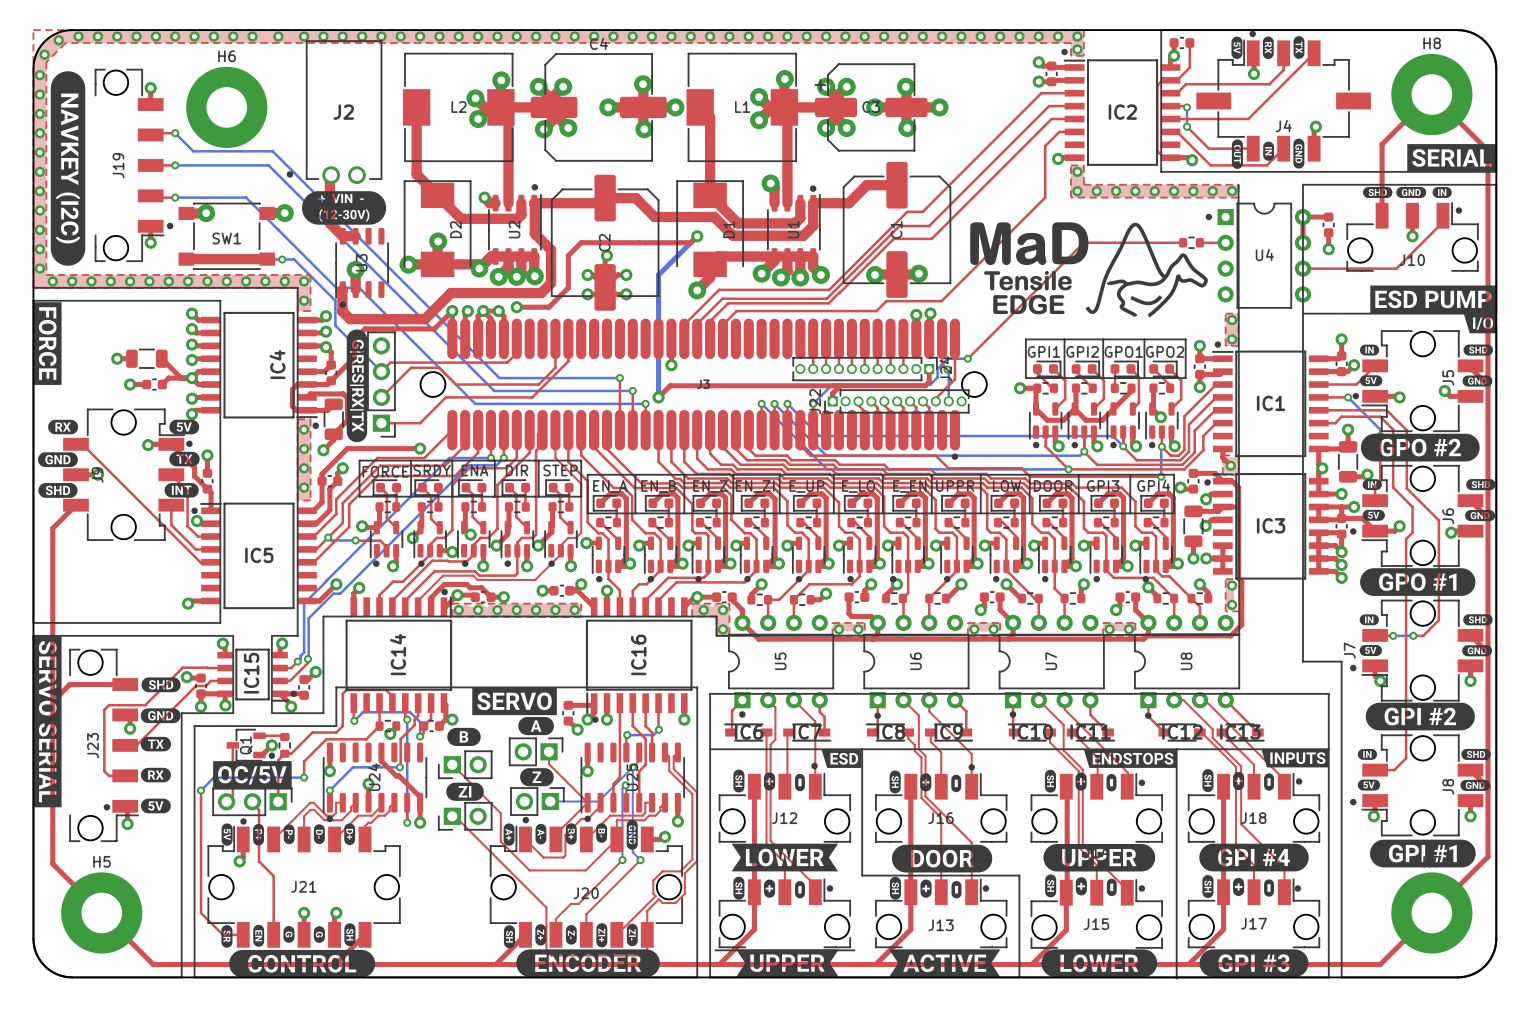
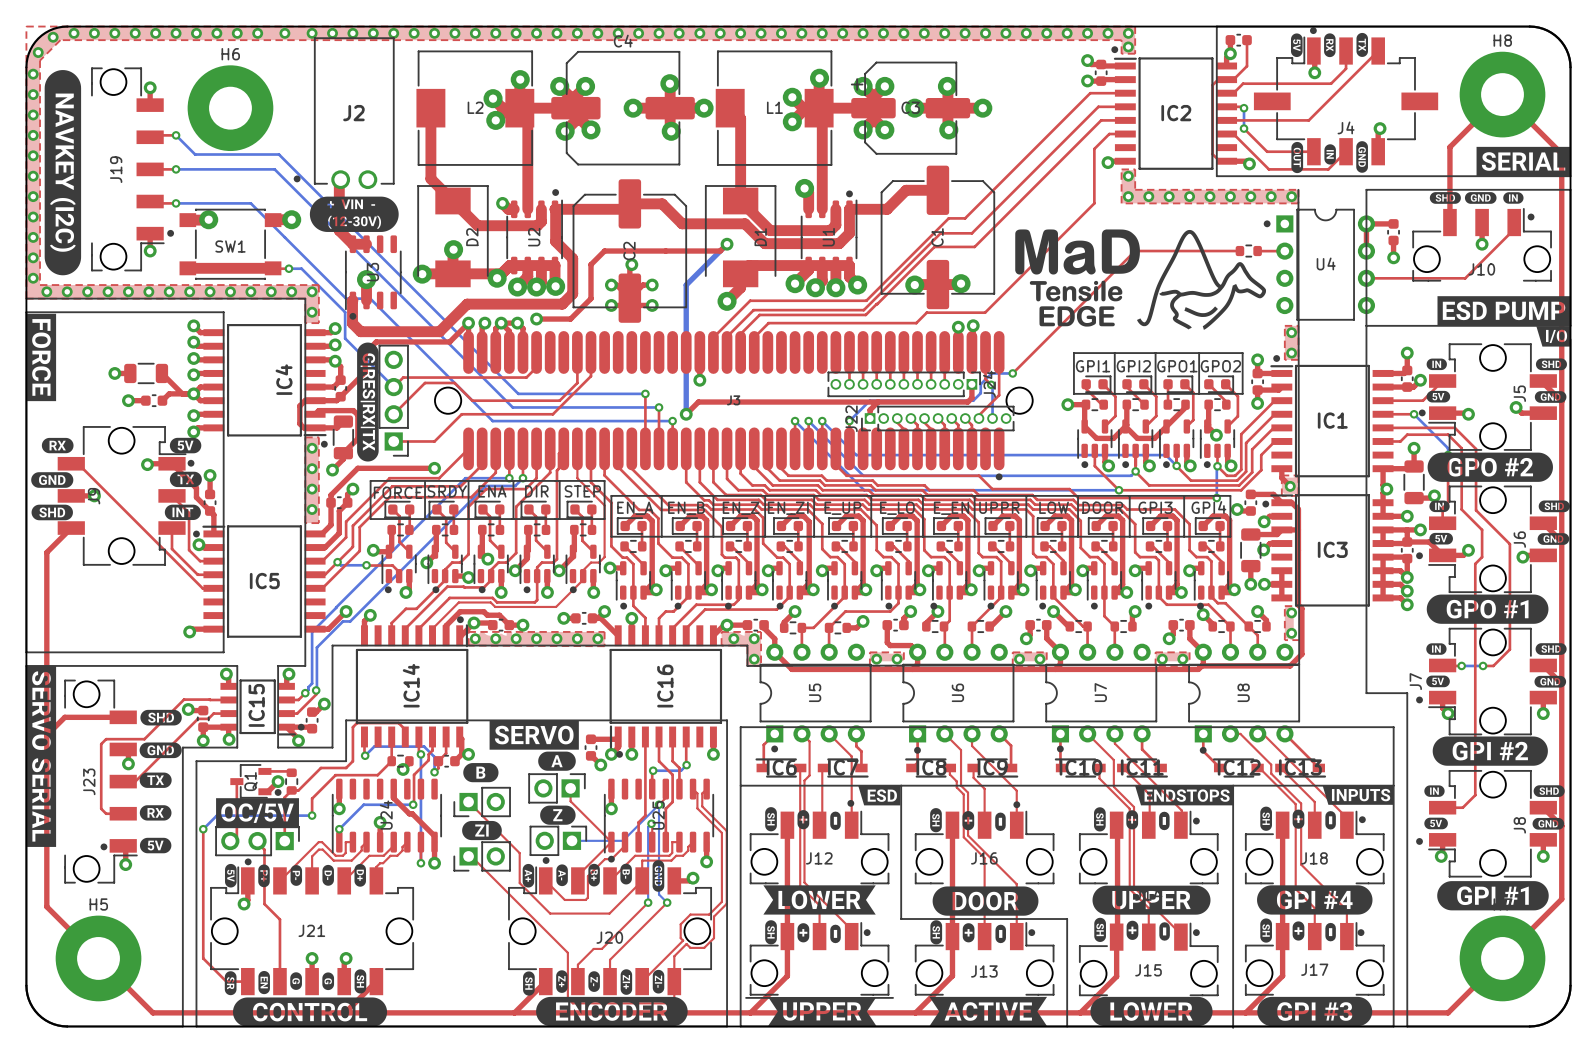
drawing: [326, 815, 334, 823] -> none

